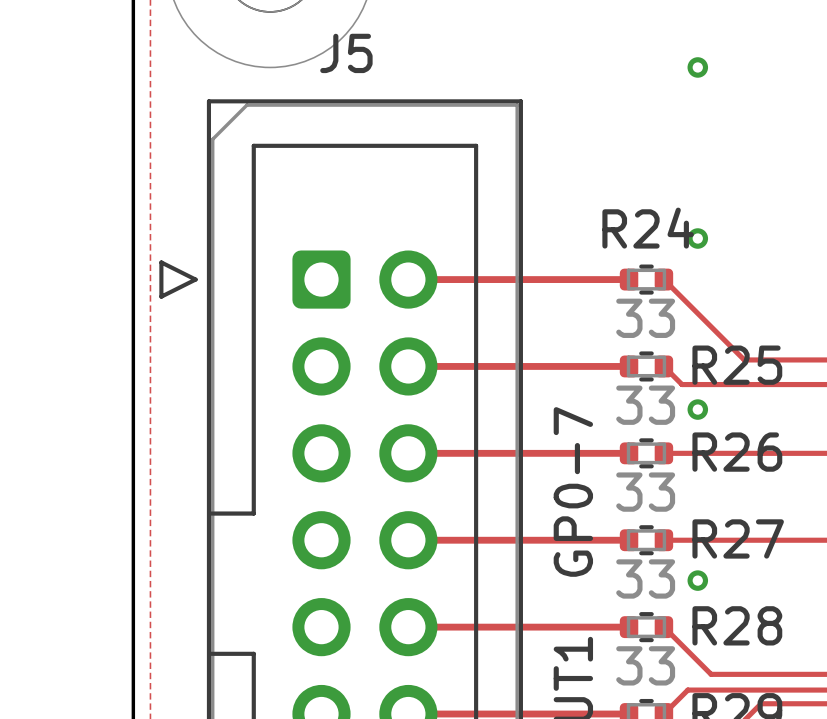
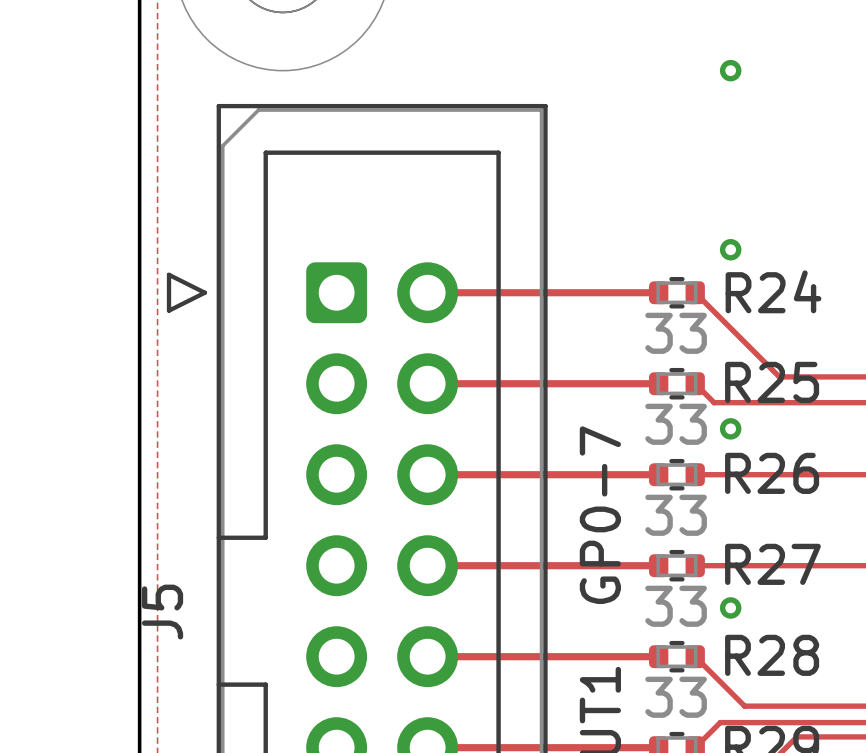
J5 name rotation: 0° (346, 53) -> 90° counterclockwise (162, 612)
J5 name position: J5 (346, 53) -> J5 (162, 612)
R24 name position: R24 (648, 228) -> R24 (773, 291)

